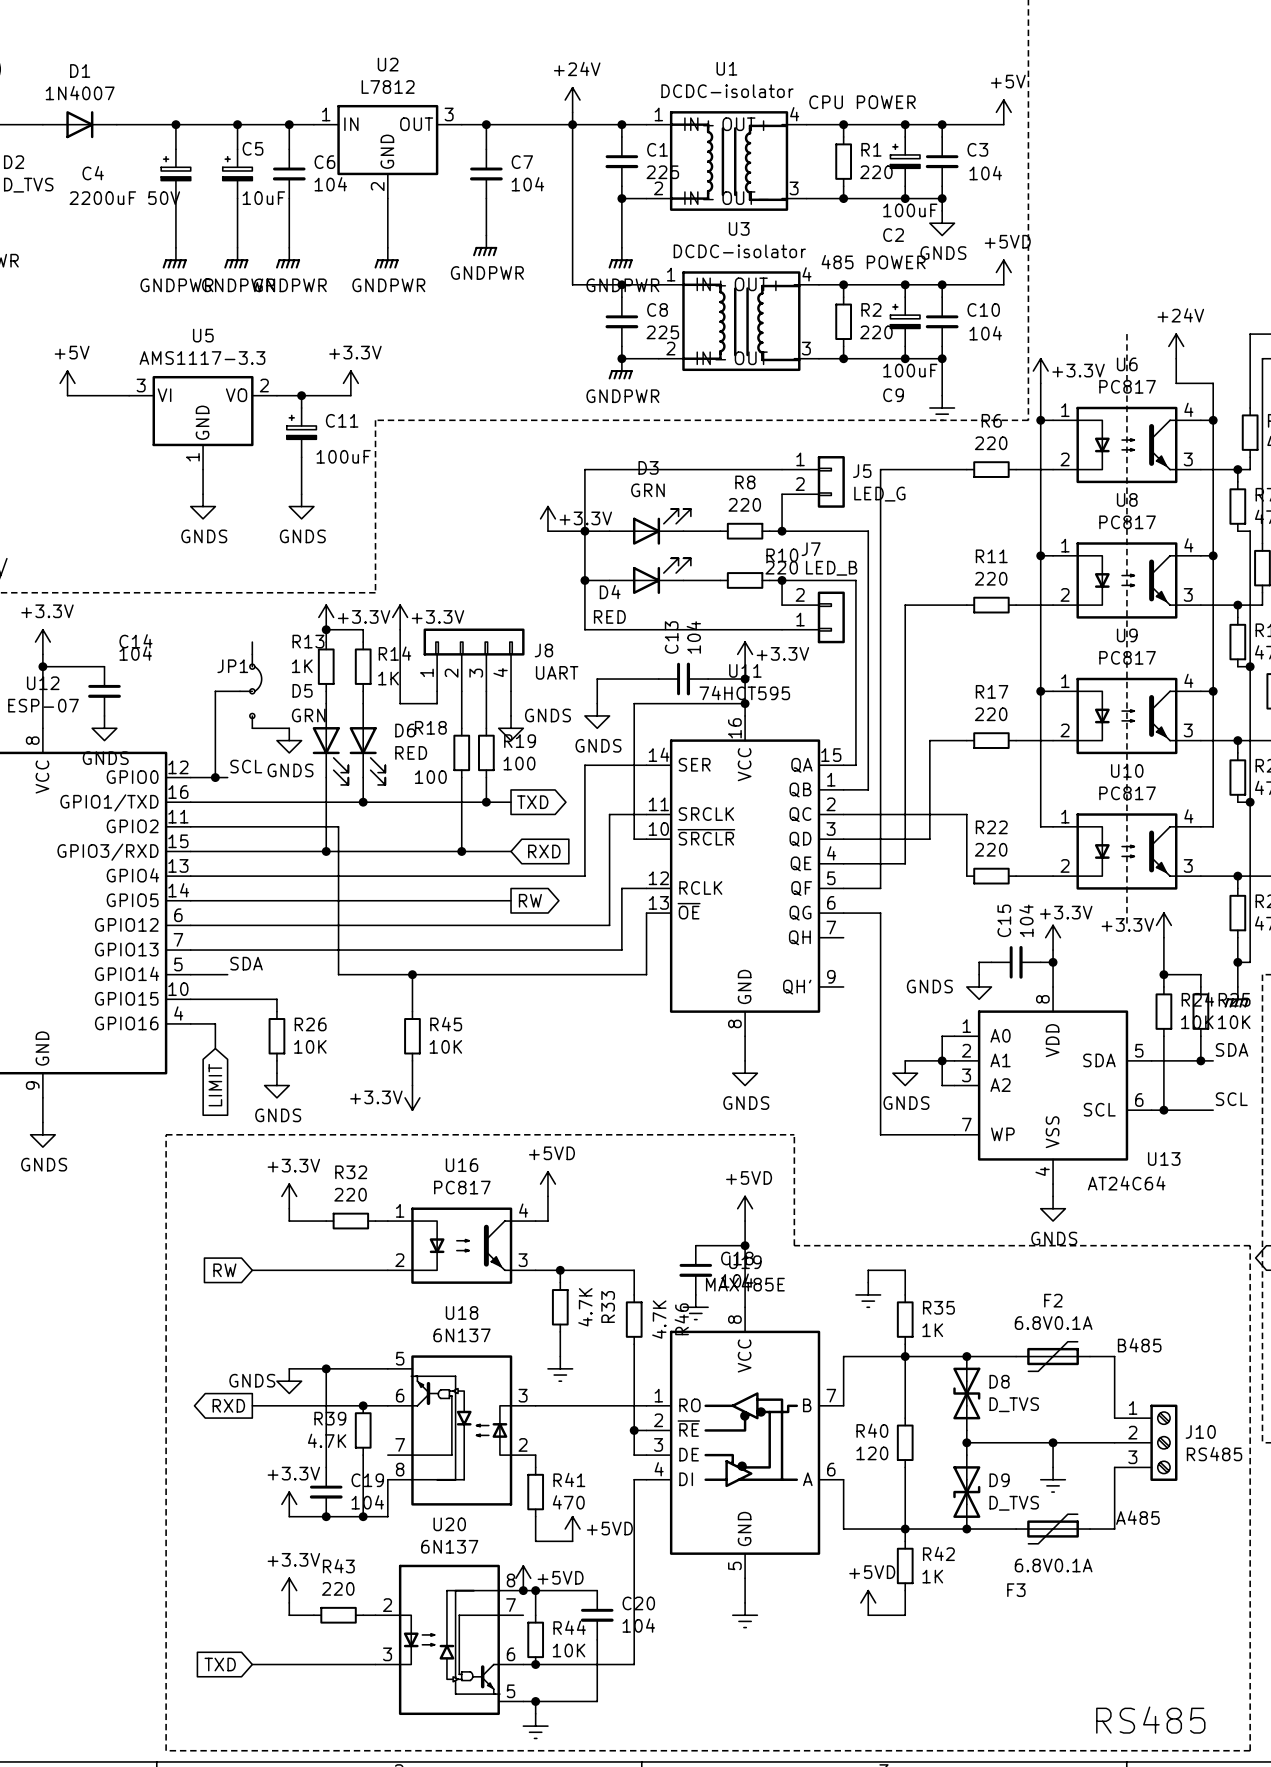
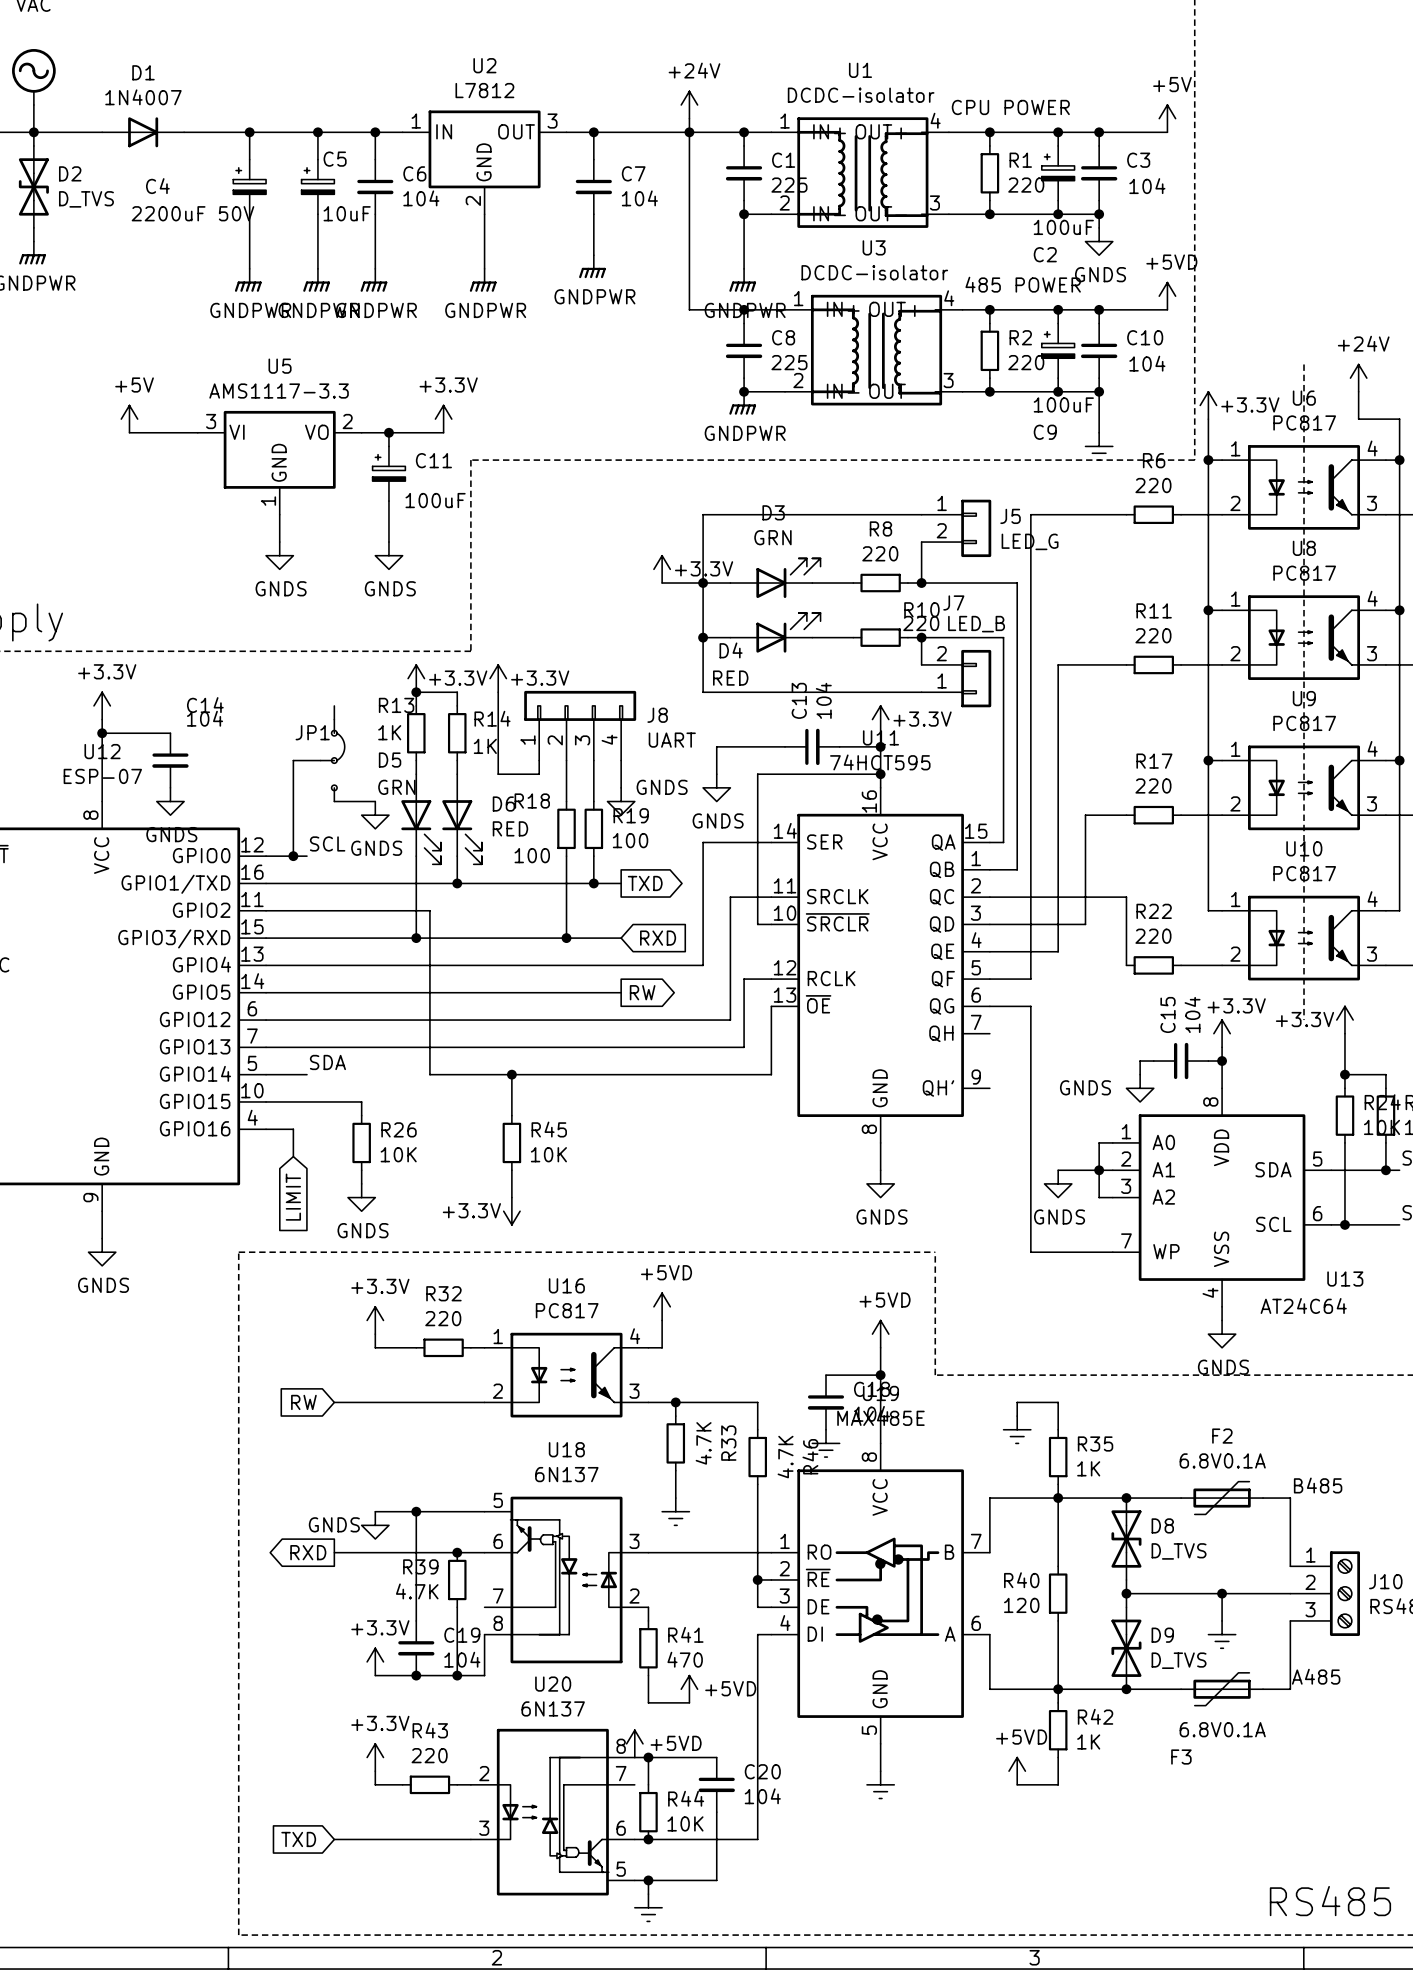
junction: (523, 1590) -> none

